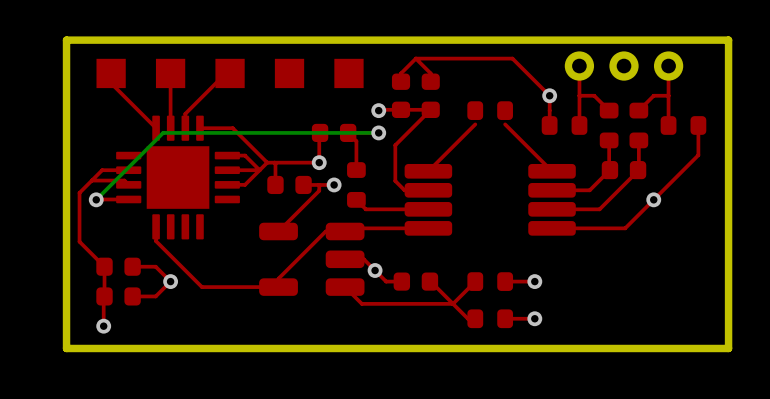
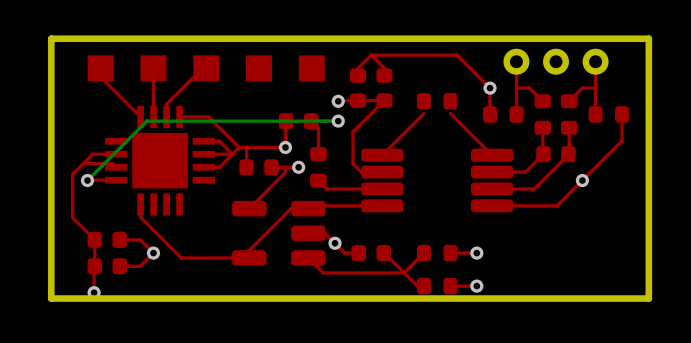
board edge: (66, 40) (66, 348) (728, 348) (728, 332) -> (61, 38) (51, 38) (51, 298) (648, 298)

